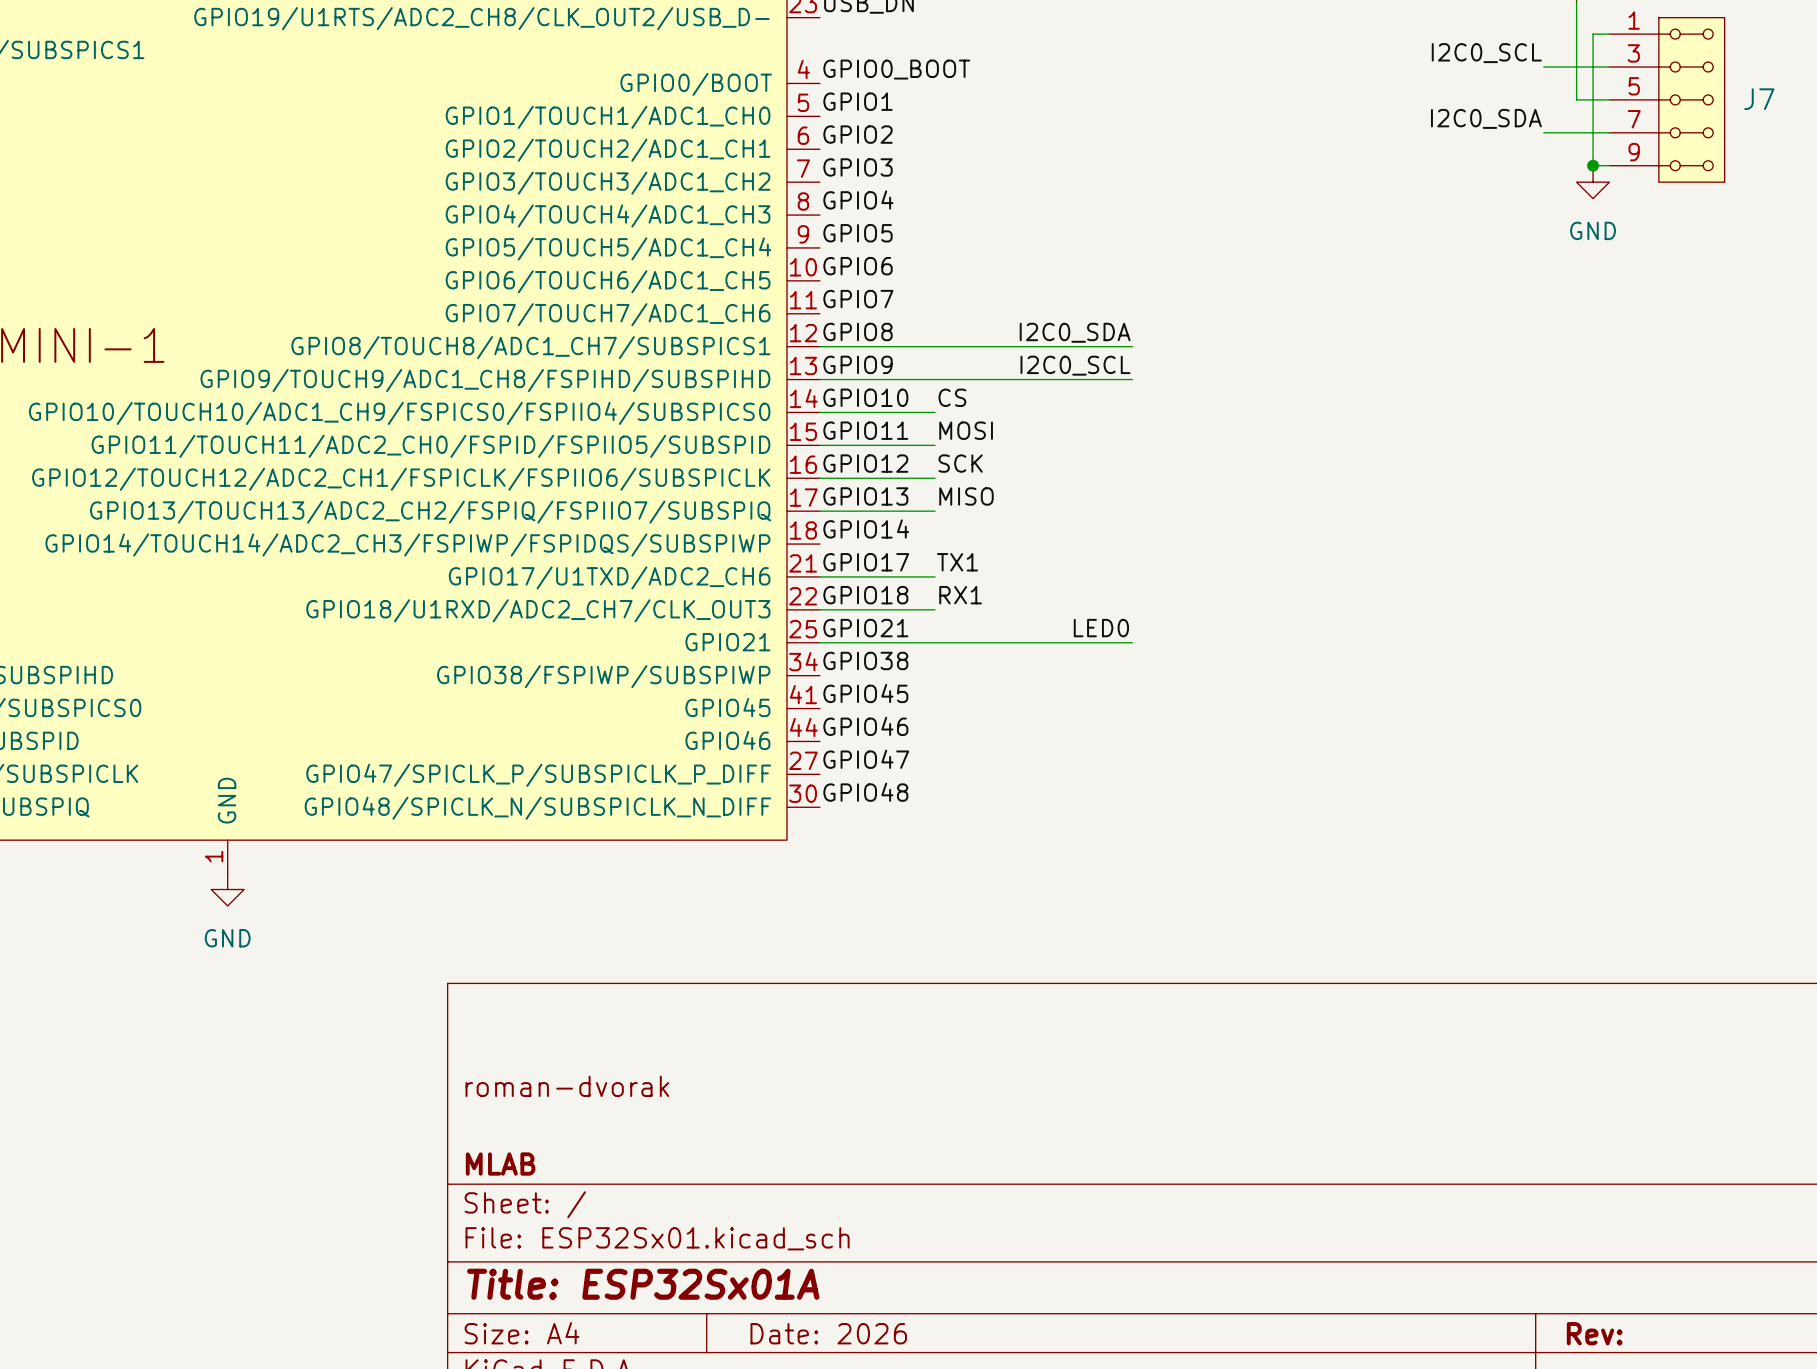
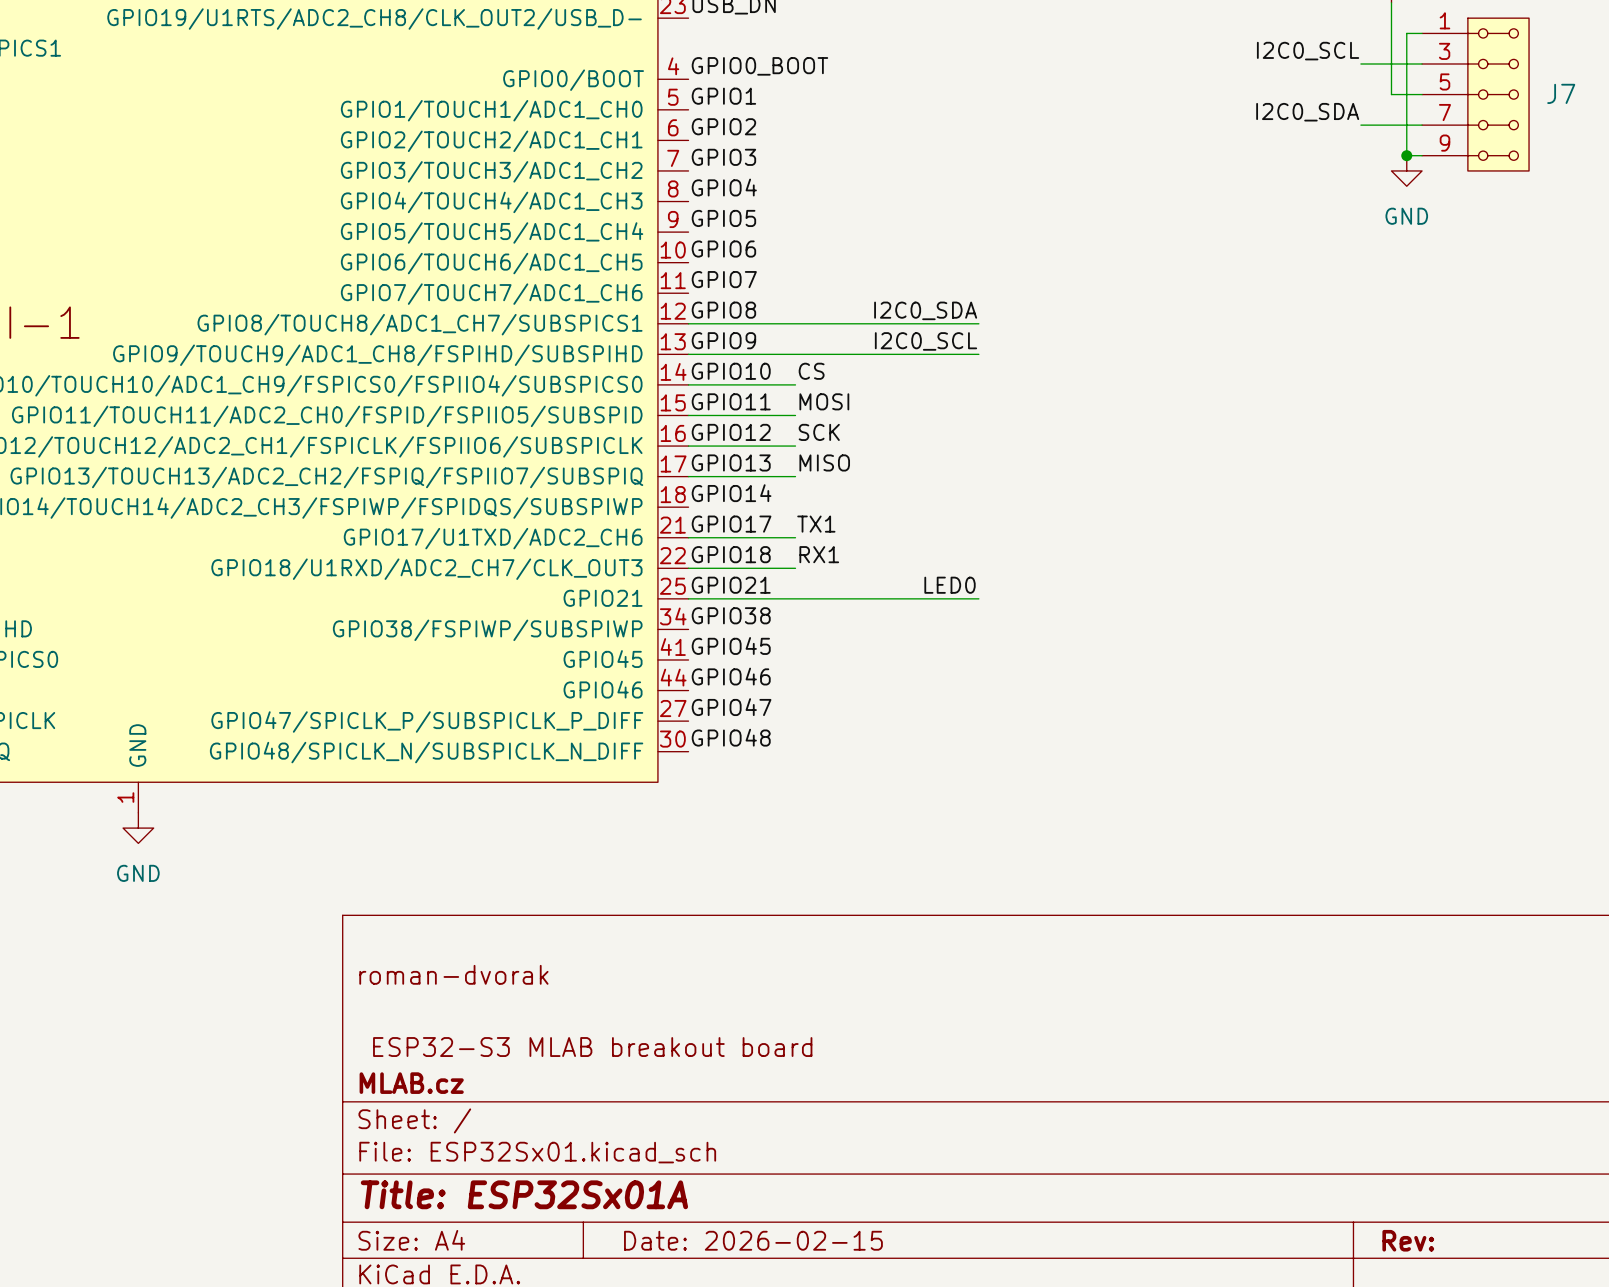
title block position: roman-dvorak (567, 1086) -> roman-dvorak (453, 974)
title block: none -> ESP32-S3 MLAB breakout board (592, 1047)
title block: MLAB (500, 1164) -> MLAB.cz (411, 1083)
title block: Date: 2026 (828, 1333) -> Date: 2026-02-15 (753, 1240)

